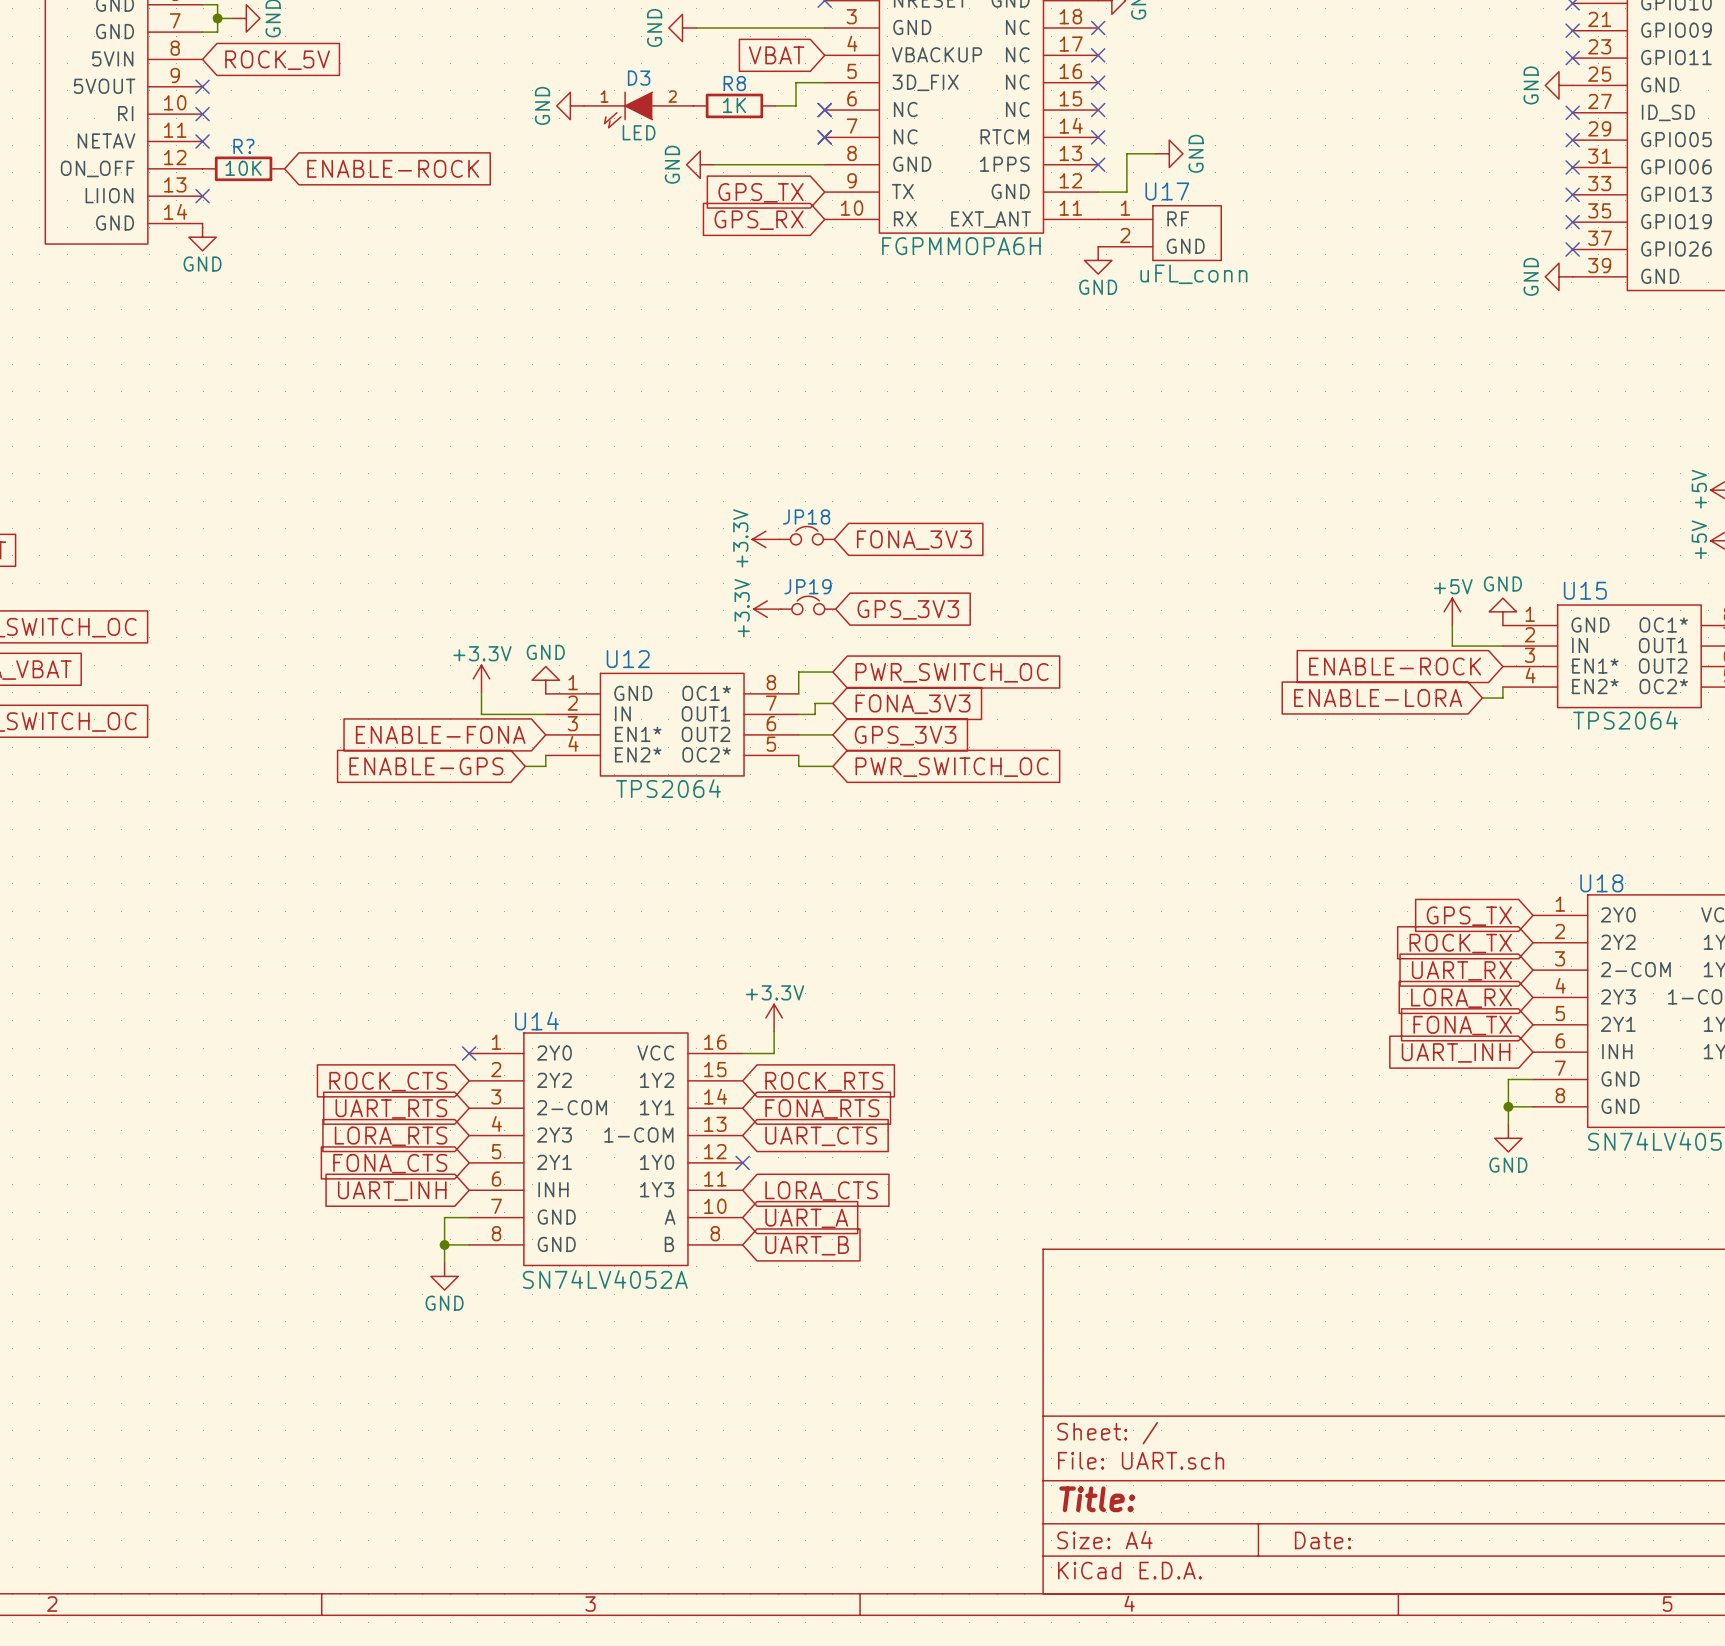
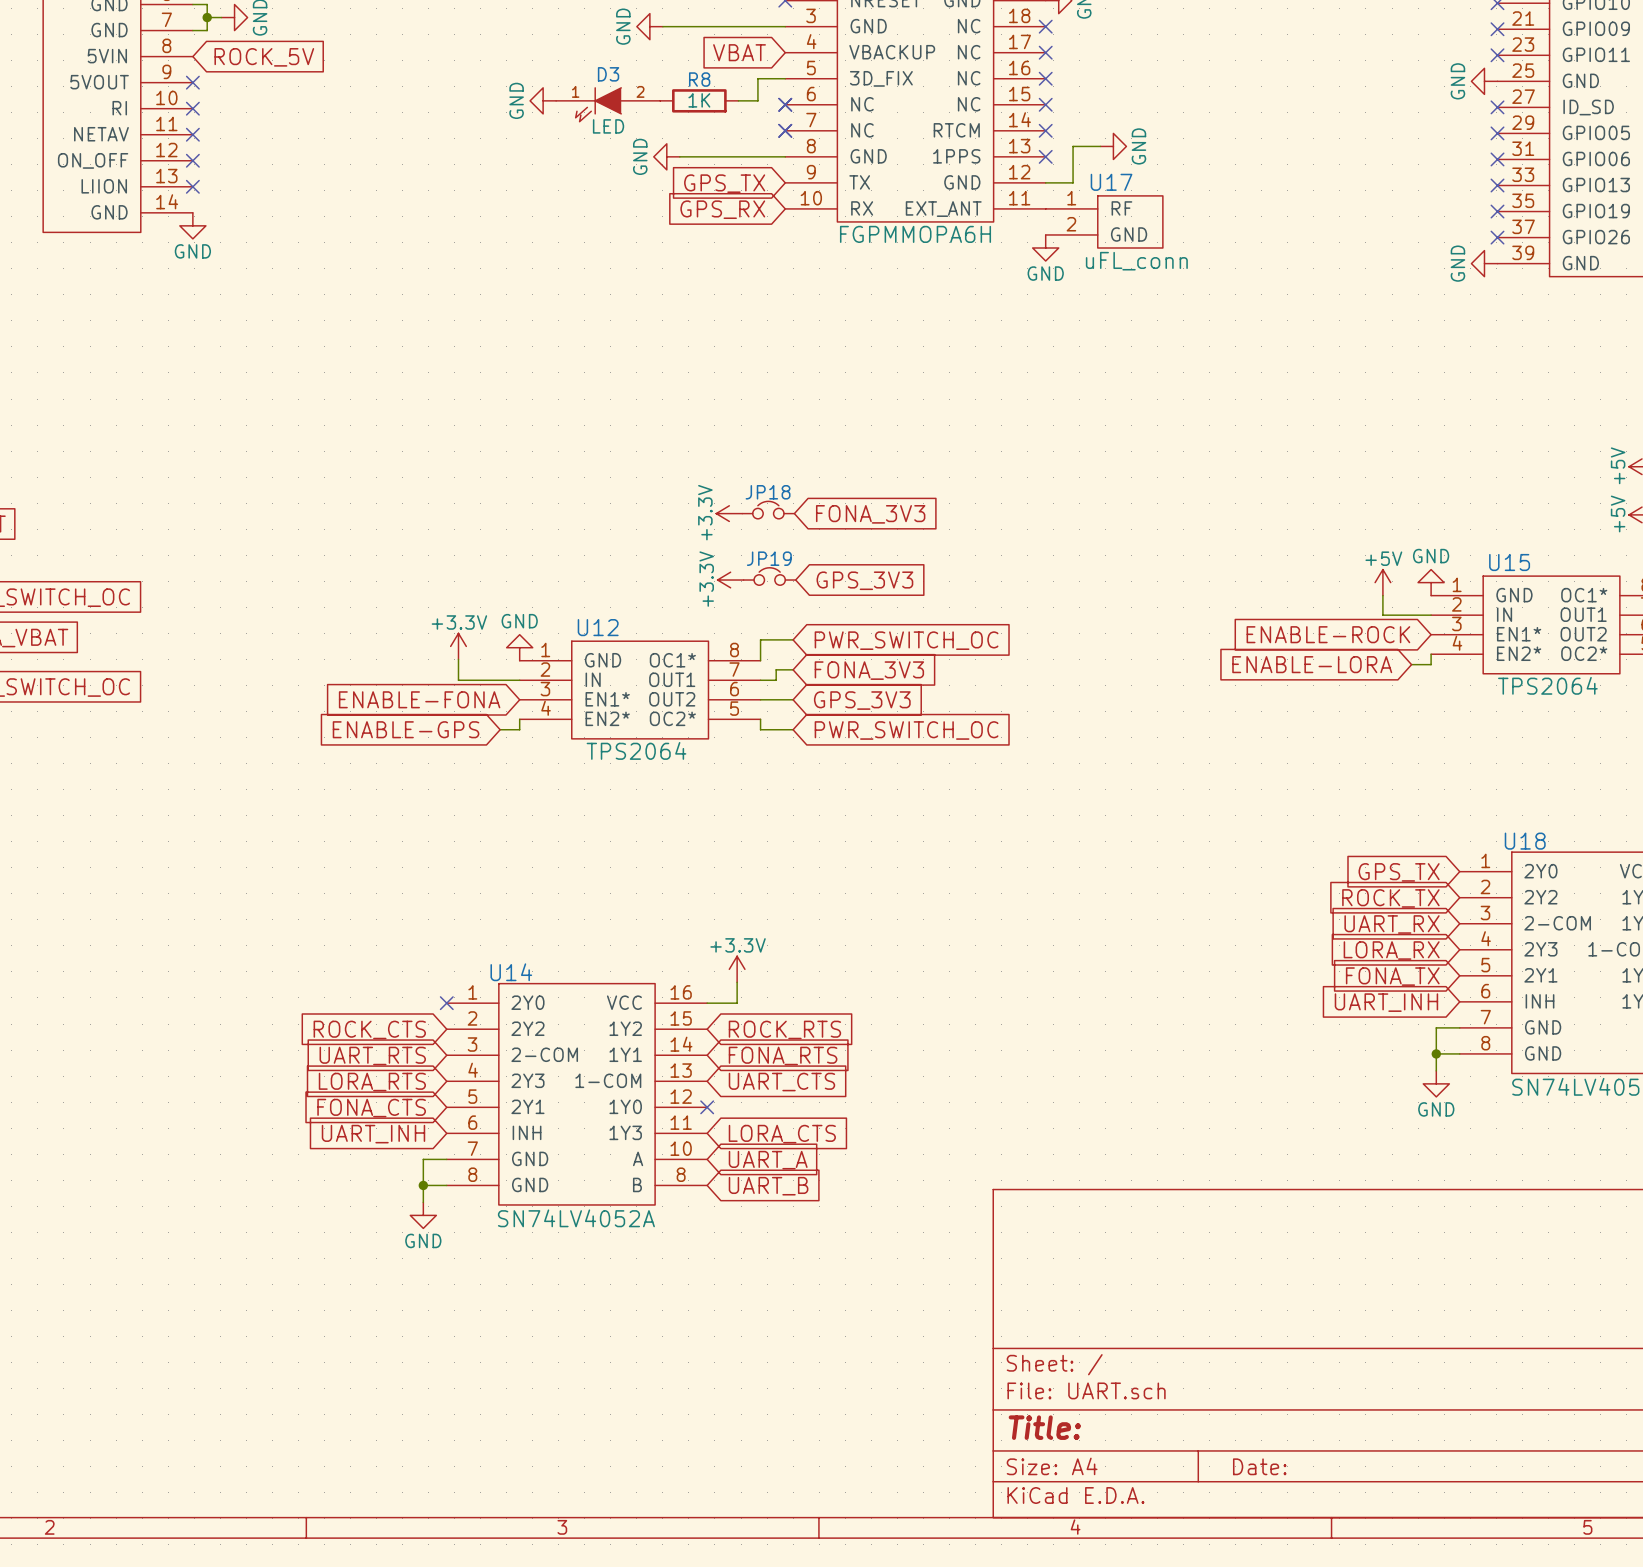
no-connect mark: none -> (192, 160)
R?: 10K (243, 168) -> none
global label: ENABLE-ROCK (393, 168) -> none

